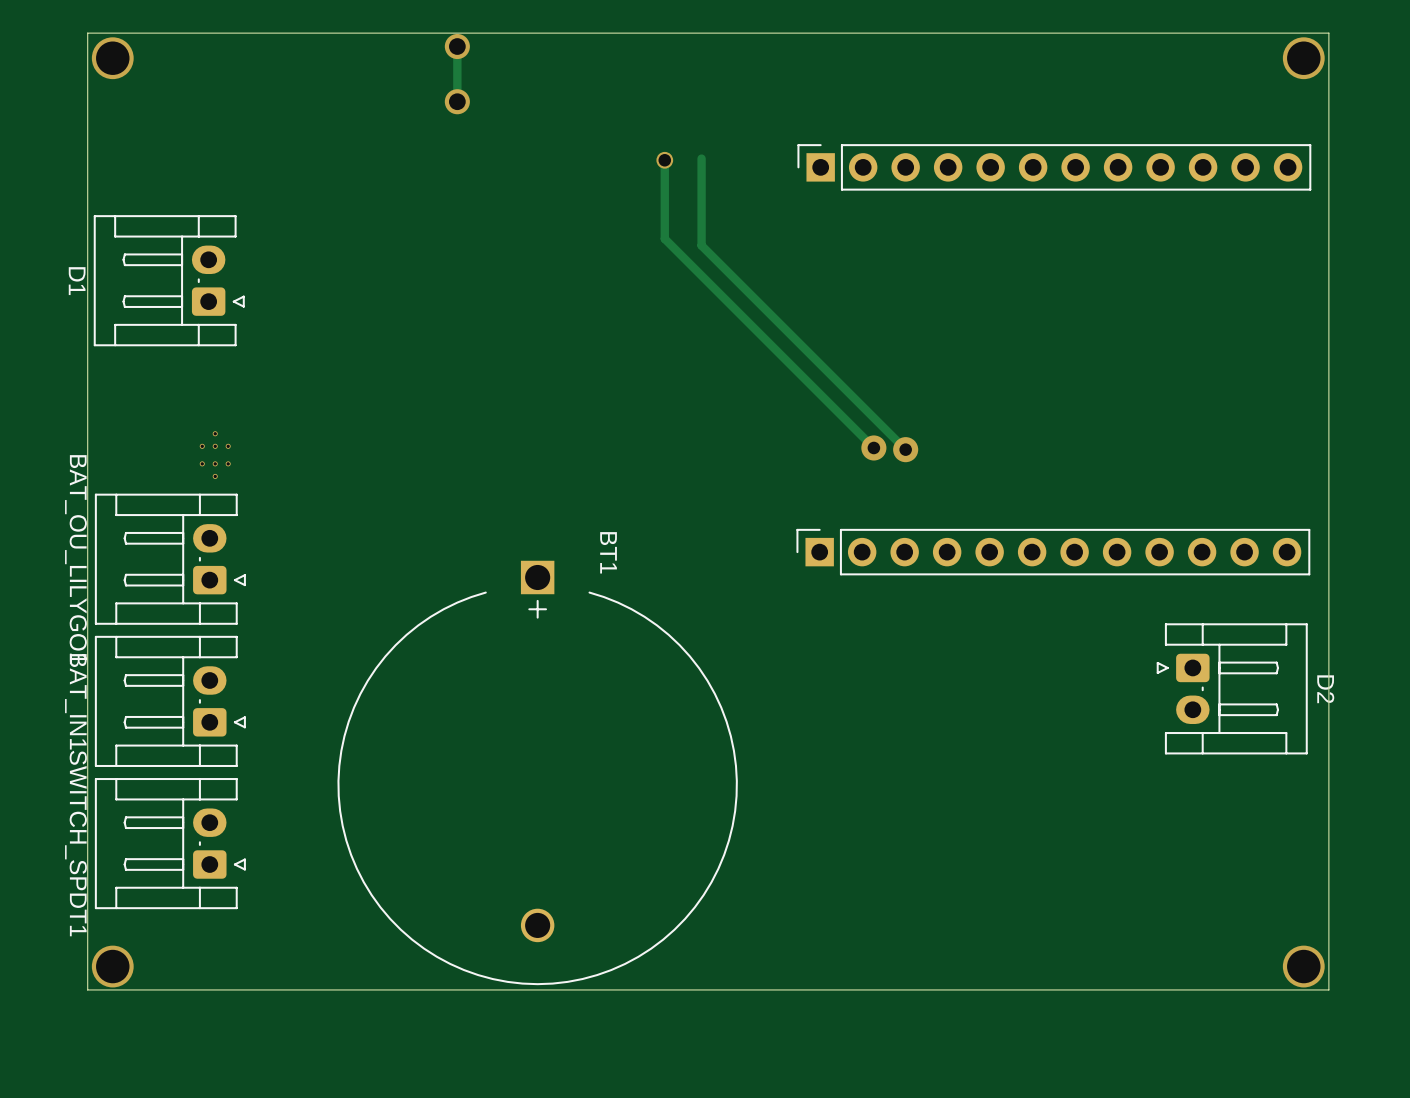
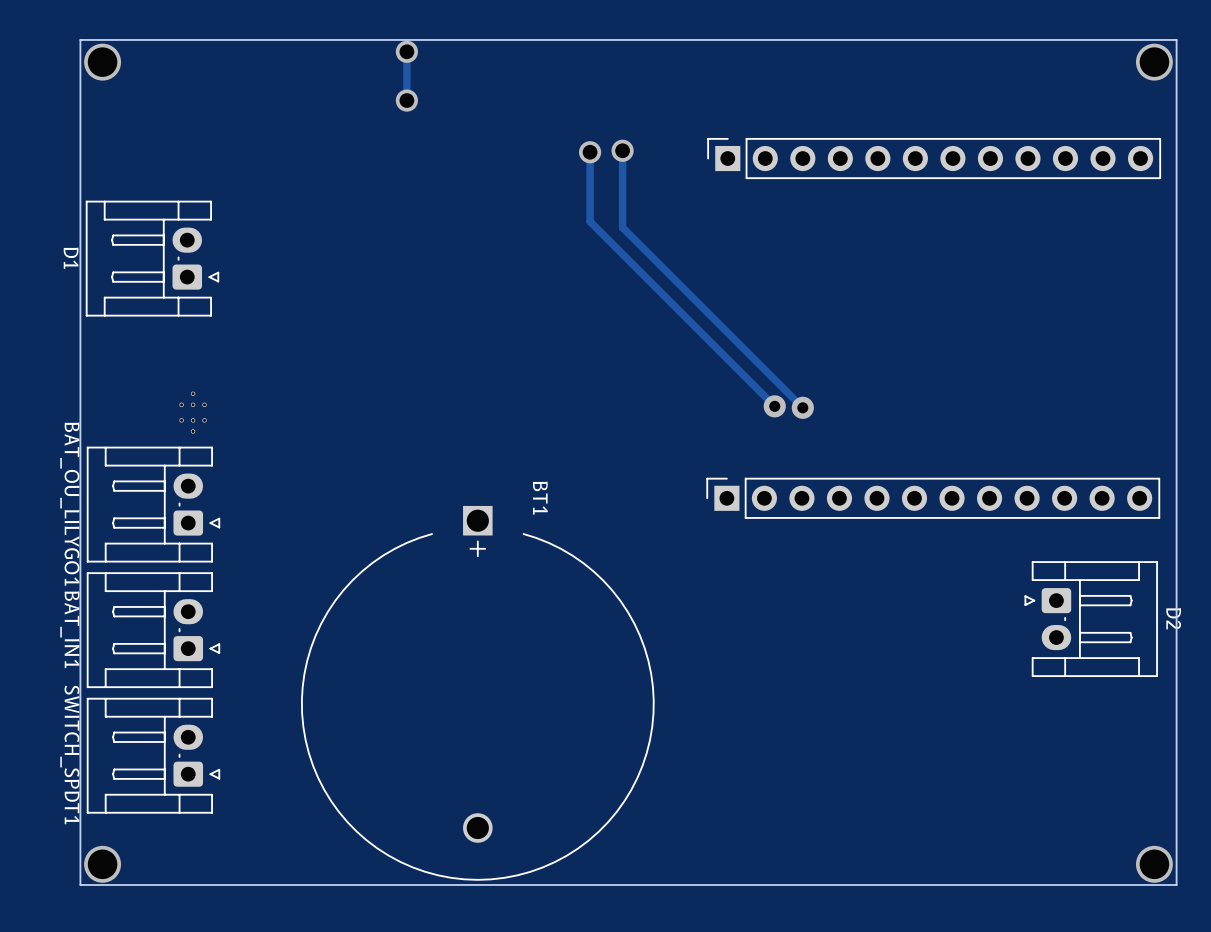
via: none -> (622, 150)
via: (664, 160) -> none
via: none -> (590, 152)

